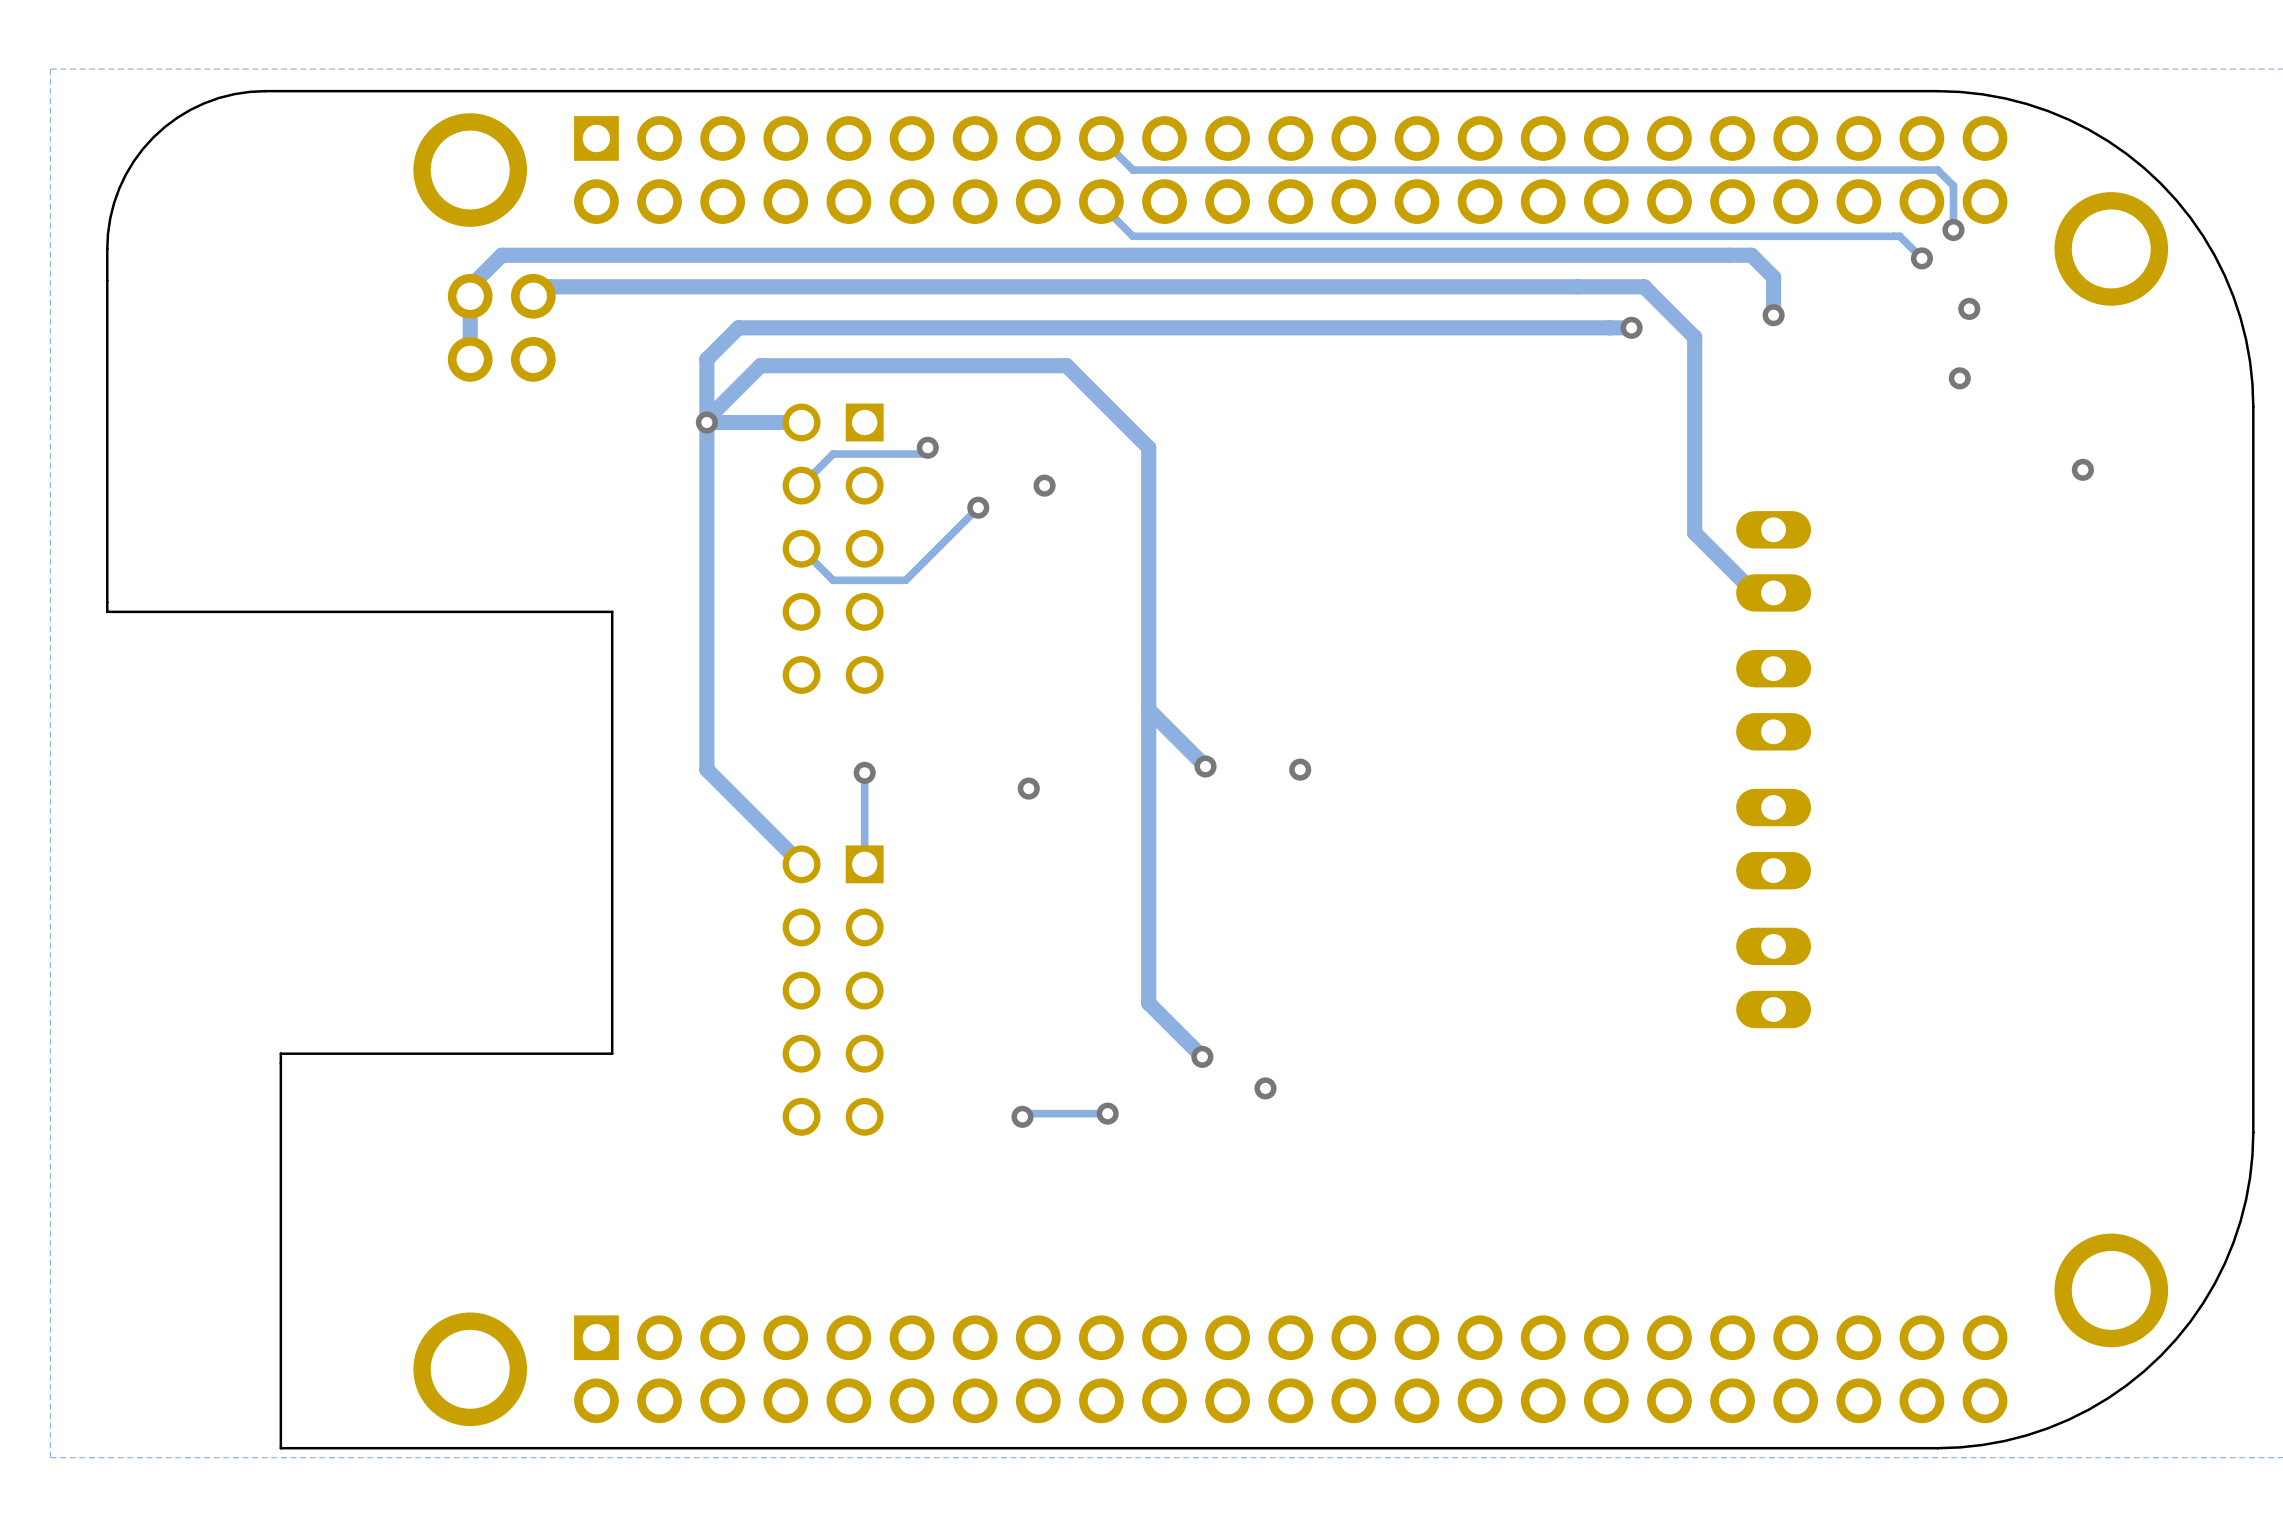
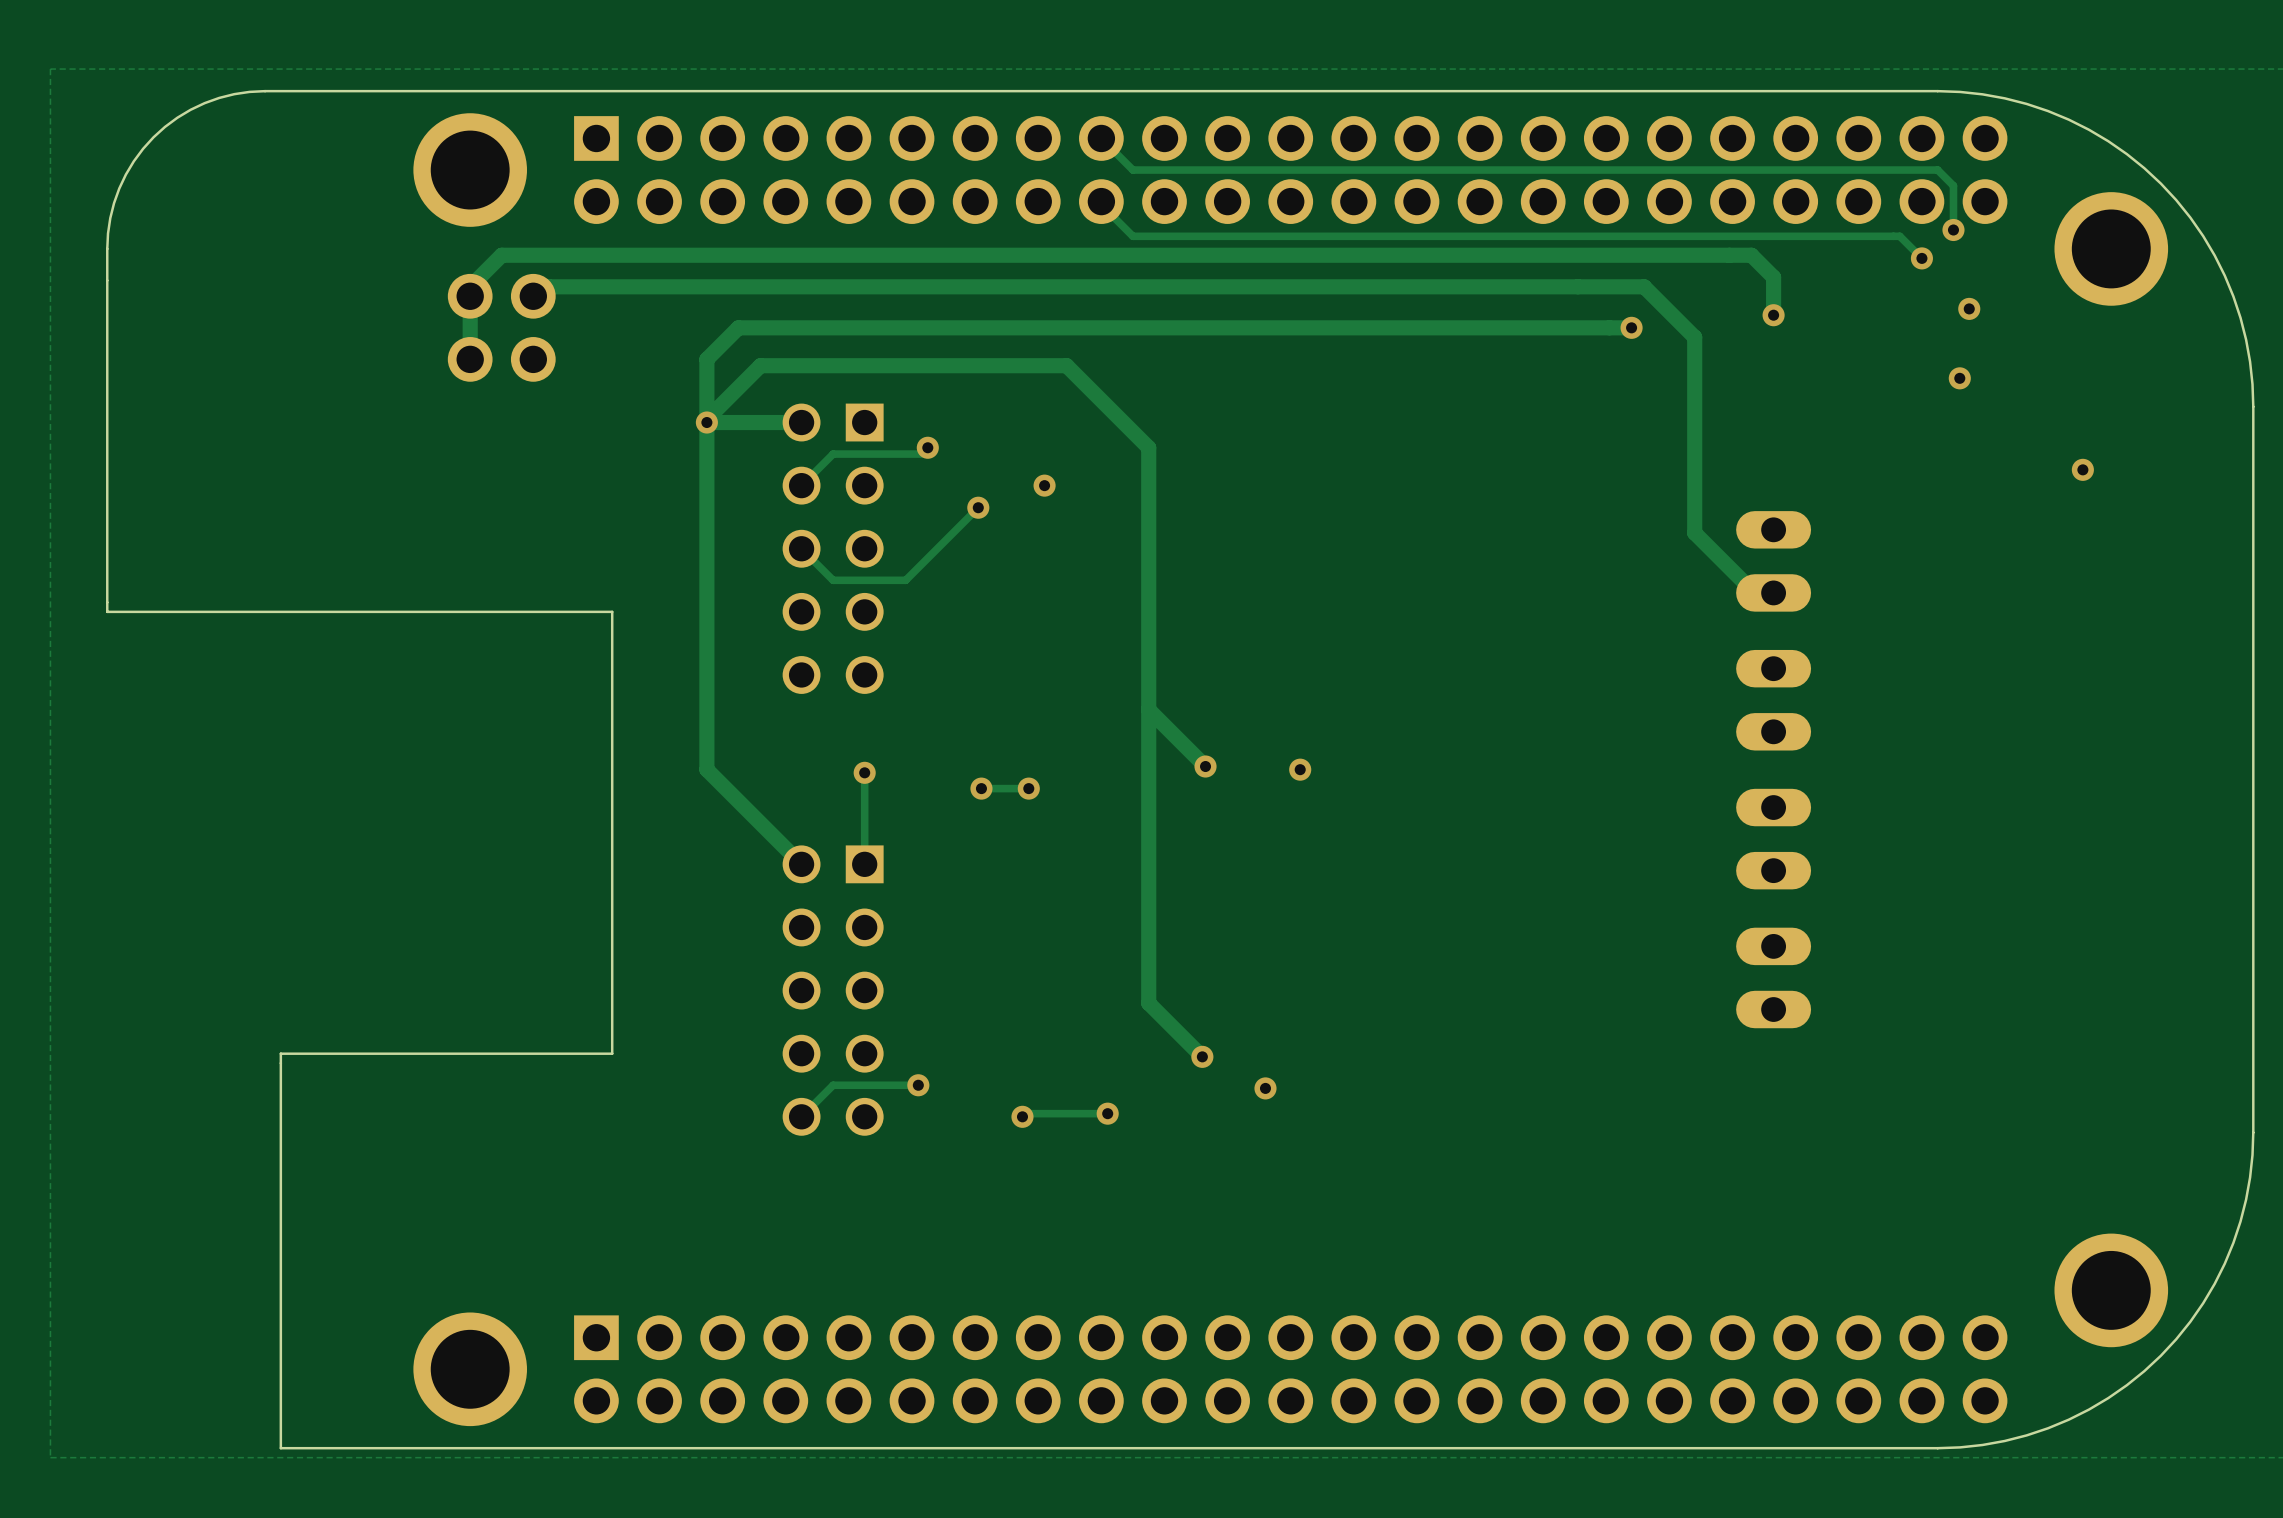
via: none -> (981, 788)
track: none -> (1028, 788) (981, 788)
track: none -> (918, 1085) (833, 1085) (801, 1116)
via: none -> (918, 1085)

